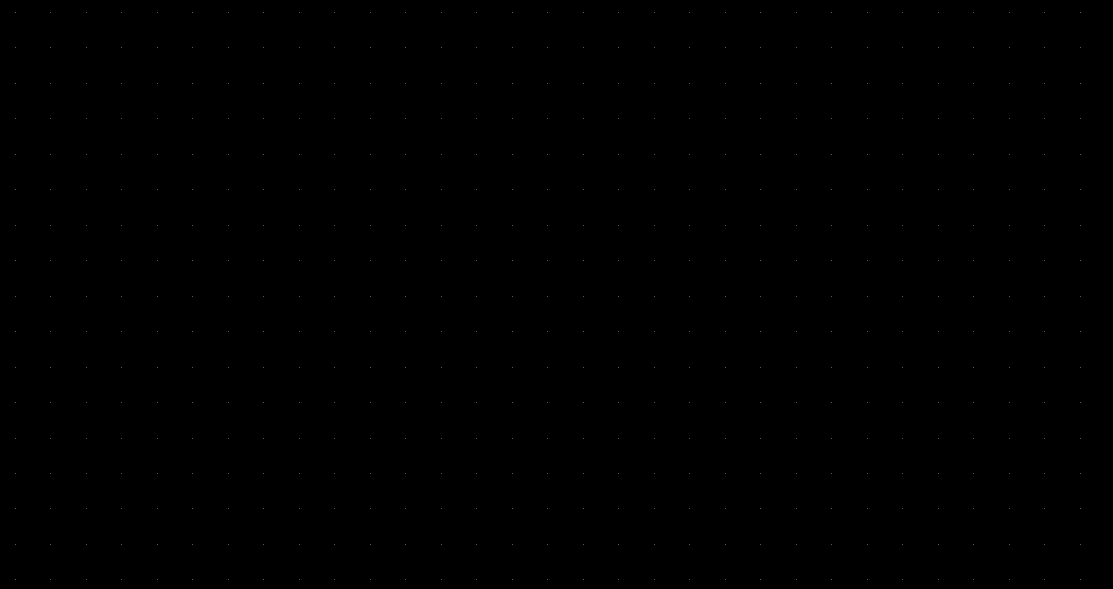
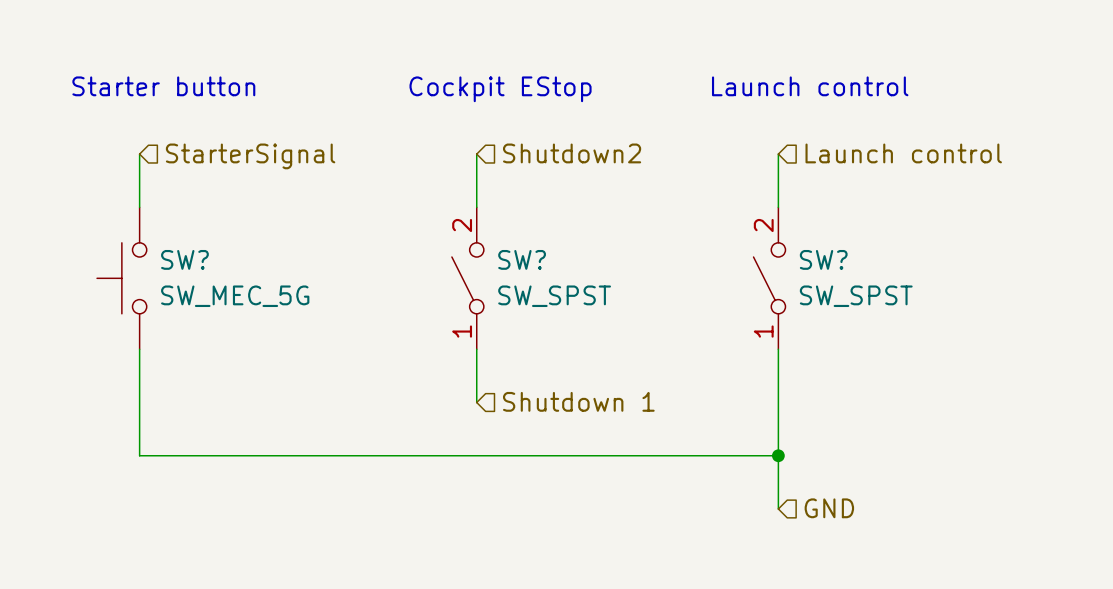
text: none -> Starter button (163, 86)
text: none -> Launch control (810, 86)
text: none -> Cockpit EStop (500, 89)
hierarchical label: none -> Shutdown2 (572, 153)
hierarchical label: none -> Launch control (903, 153)
wire: none -> (139, 154) (139, 207)
wire: none -> (476, 154) (476, 207)
wire: none -> (778, 154) (778, 207)
hierarchical label: none -> StarterSignal (250, 156)
SW?: none -> SW_MEC_5G (121, 278)
SW?: none -> SW_SPST (467, 278)
SW?: none -> SW_SPST (769, 278)
wire: none -> (139, 349) (139, 455) (778, 455)
wire: none -> (476, 349) (476, 402)
wire: none -> (778, 349) (778, 508)
hierarchical label: none -> Shutdown 1 (578, 401)
junction: none -> (778, 455)
hierarchical label: none -> GND (829, 508)

